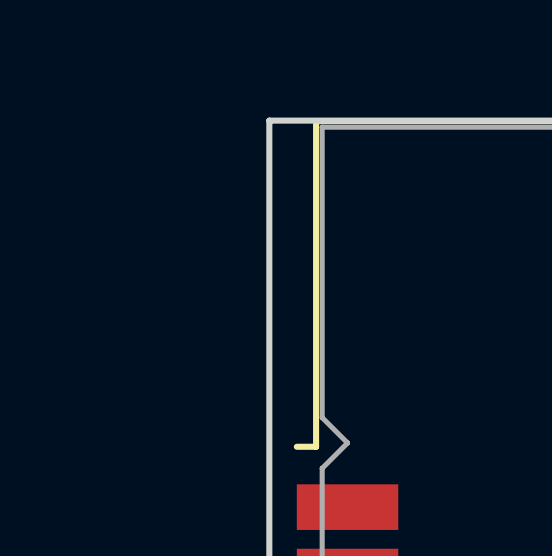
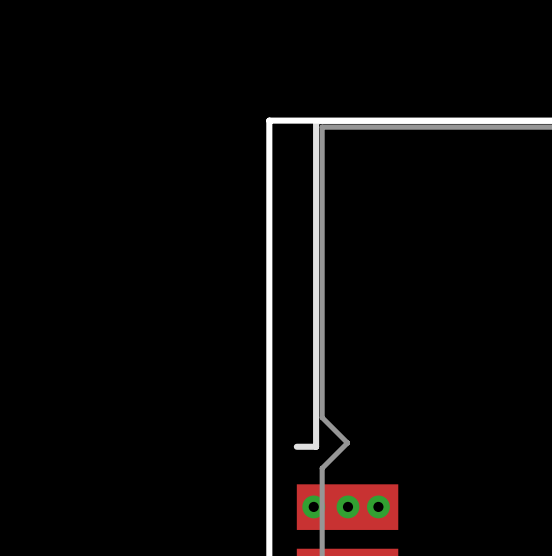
via: none -> (313, 506)
via: none -> (348, 506)
via: none -> (378, 506)

